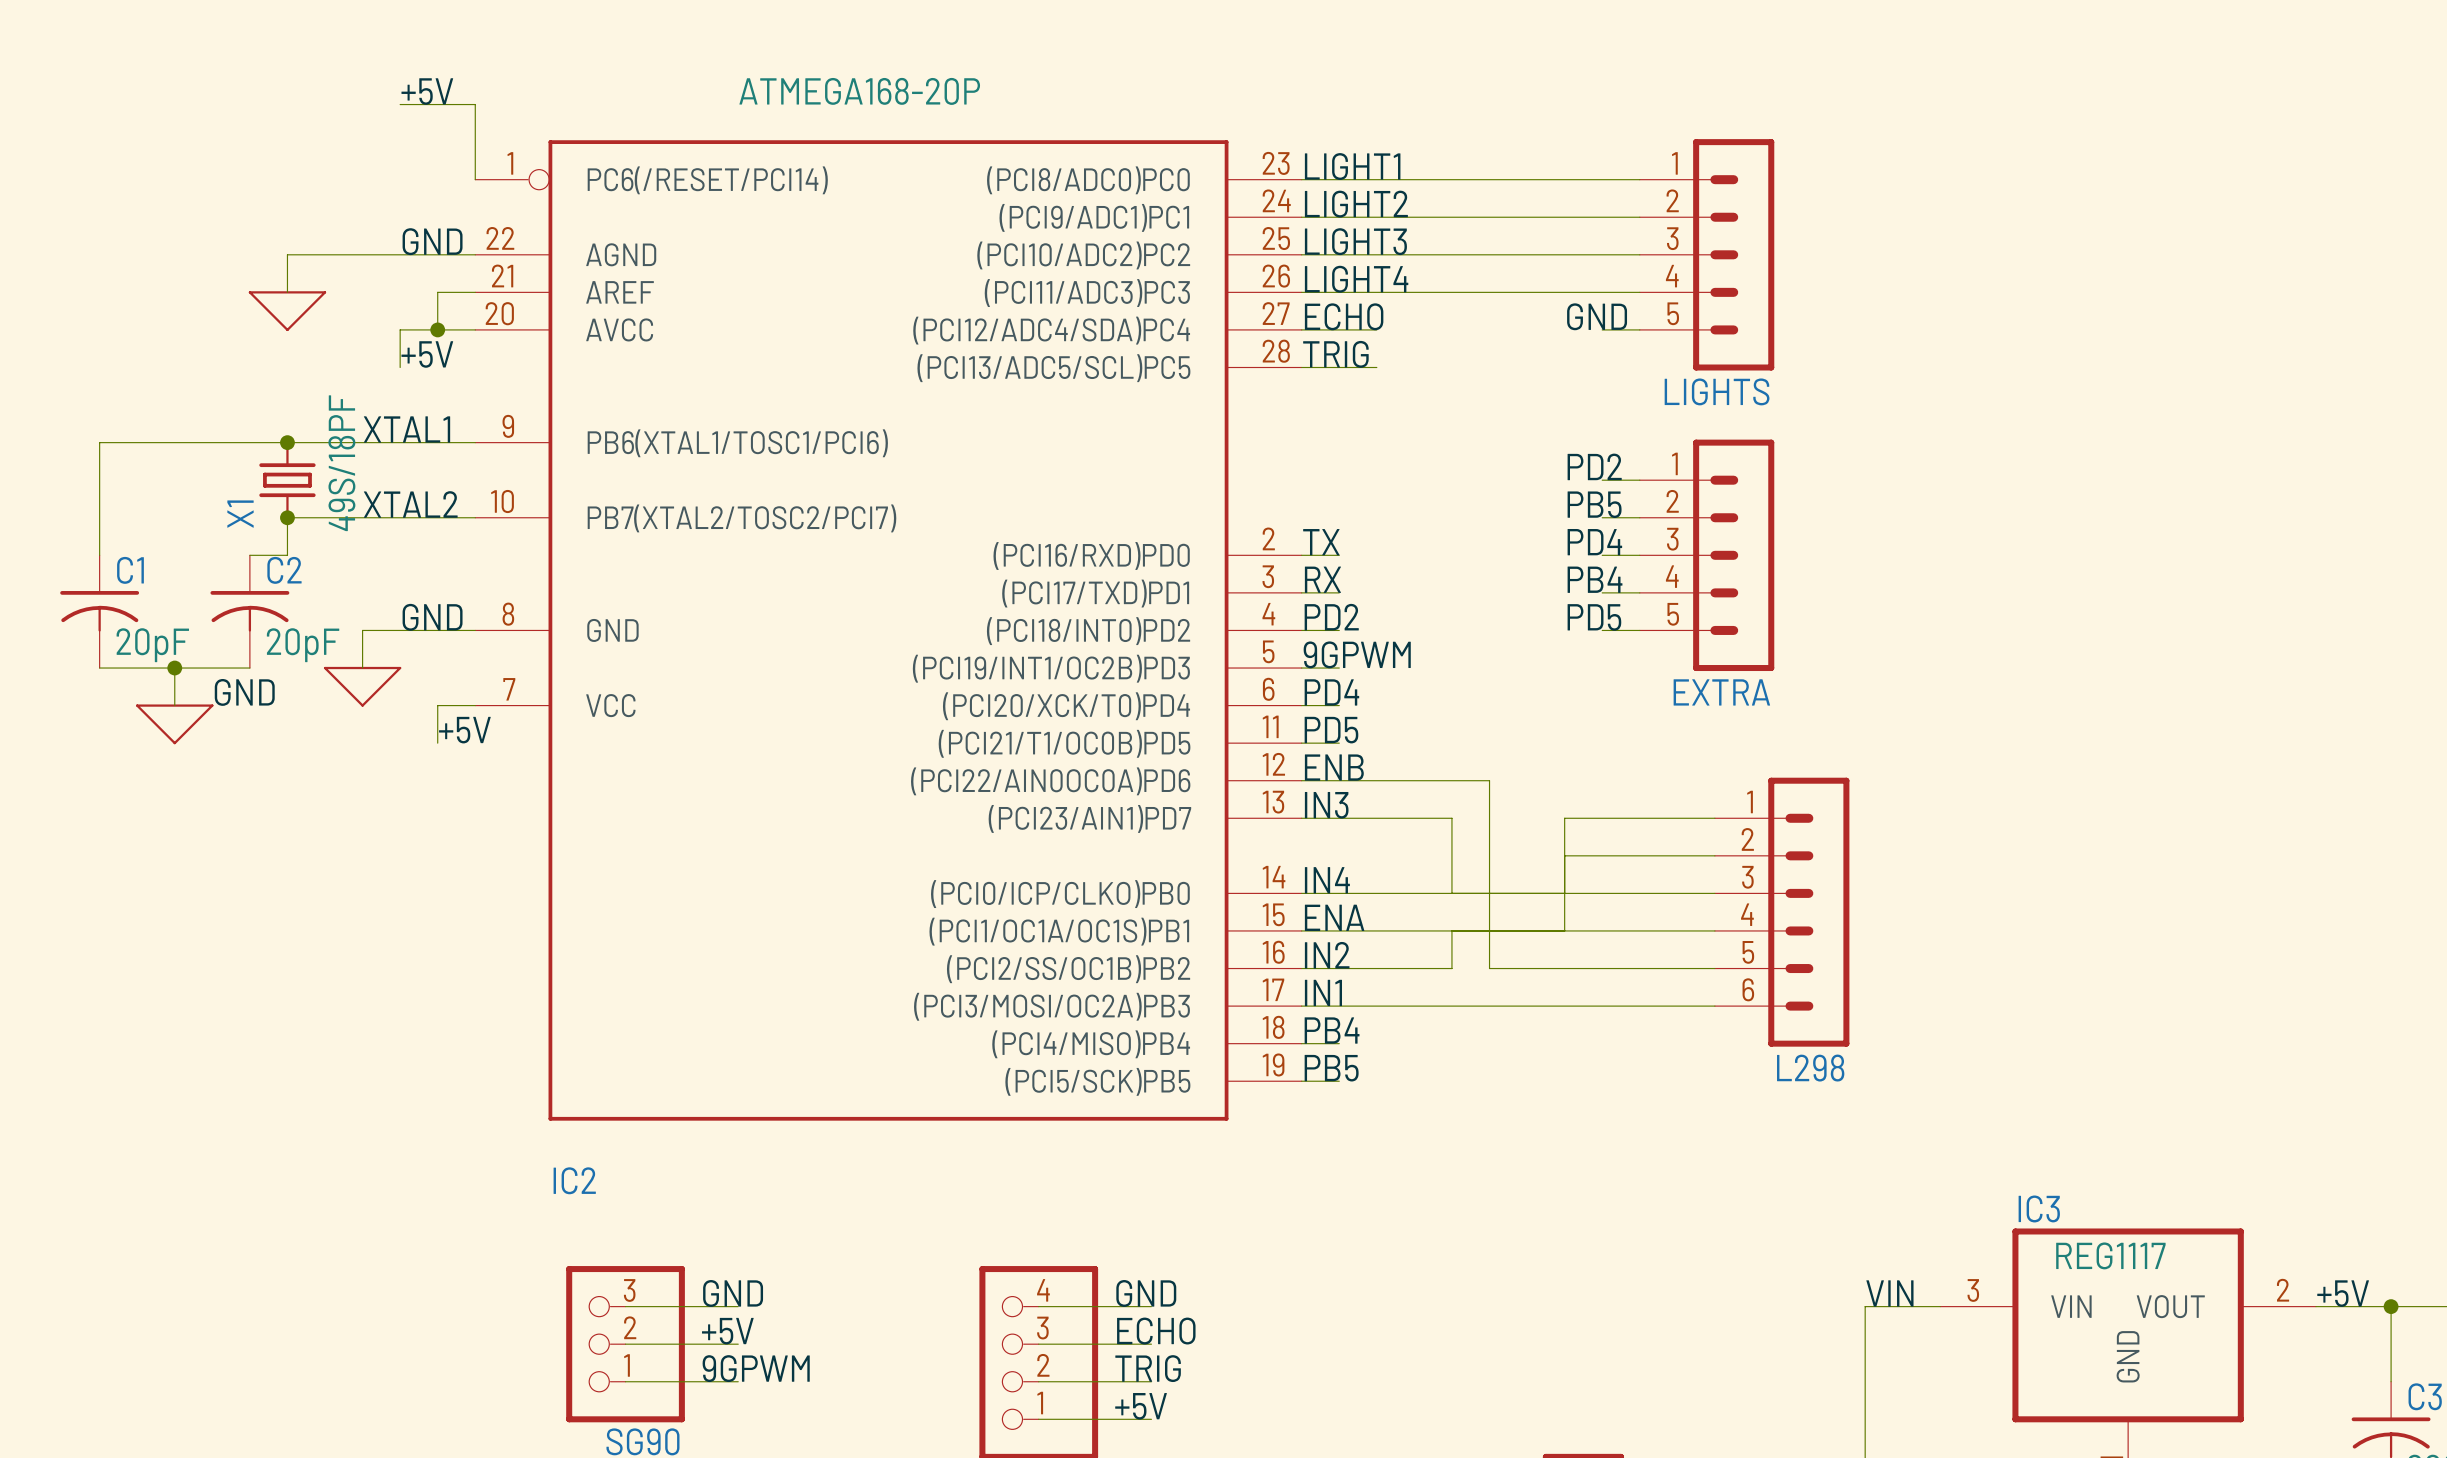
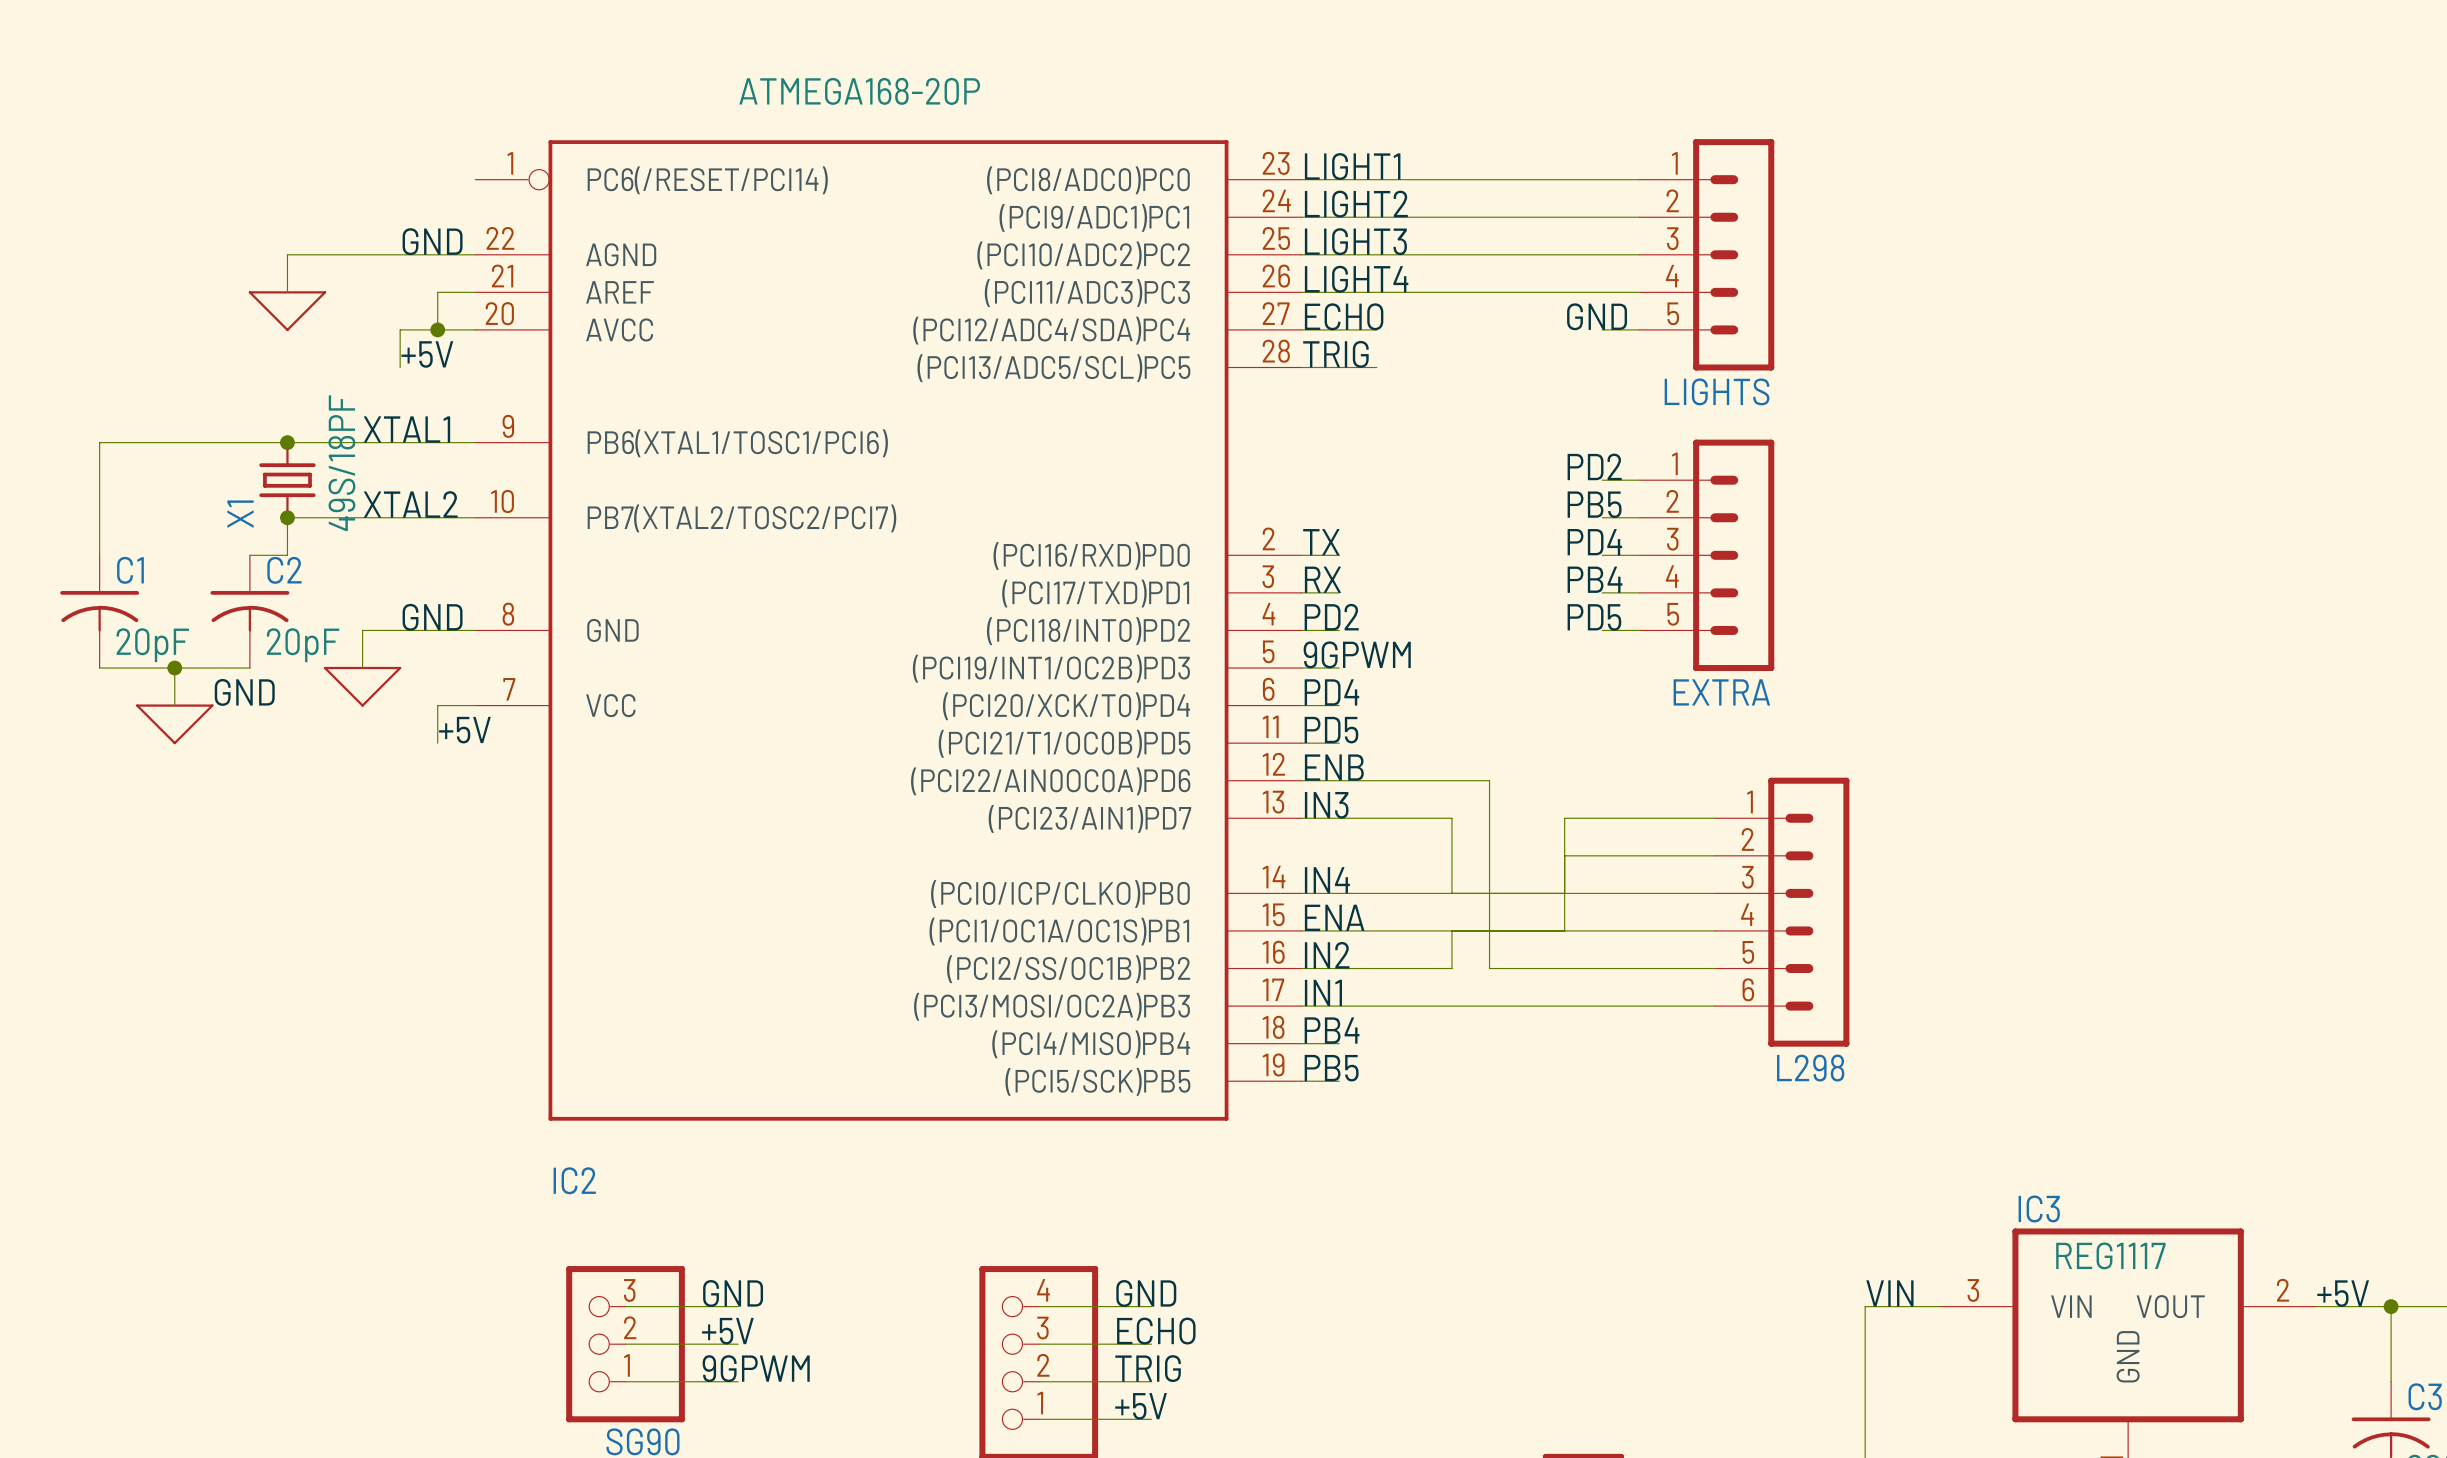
label: +5V (427, 91) -> none
wire: (400, 104) (475, 104) (475, 179) -> none

